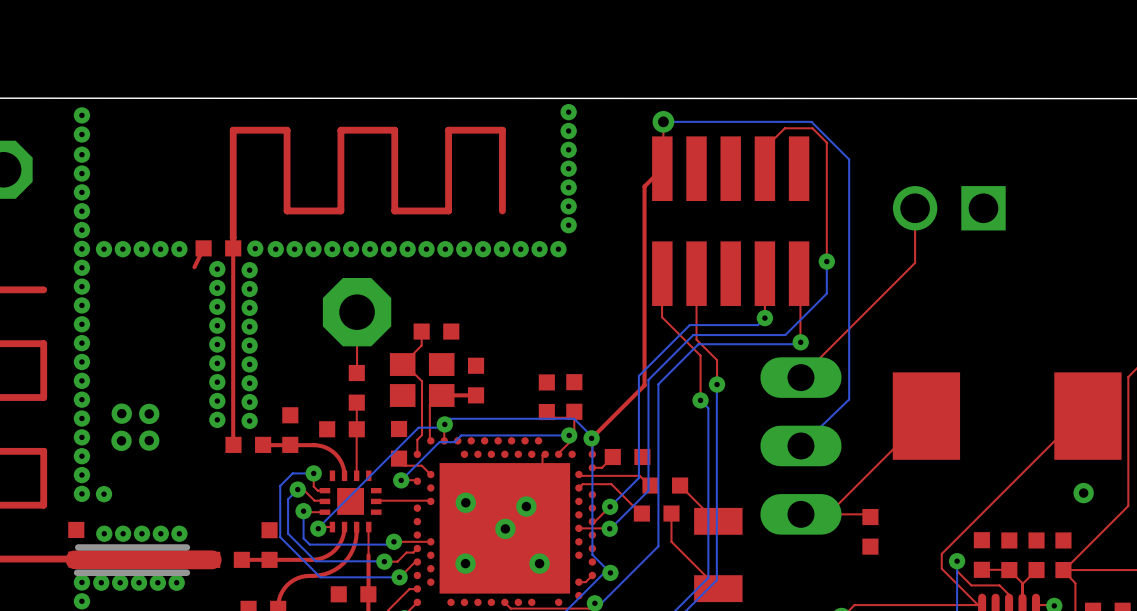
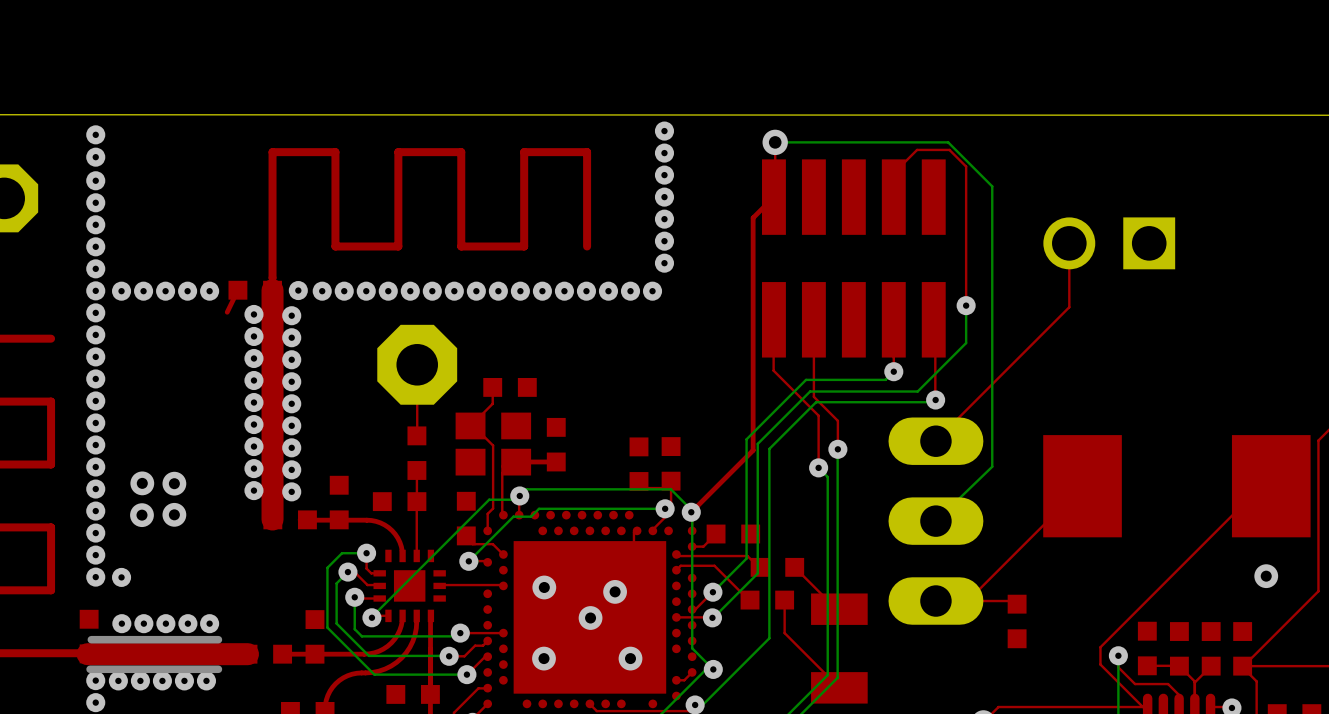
top track width: thin (233, 248) (233, 444) -> thick (272, 290) (272, 519)

